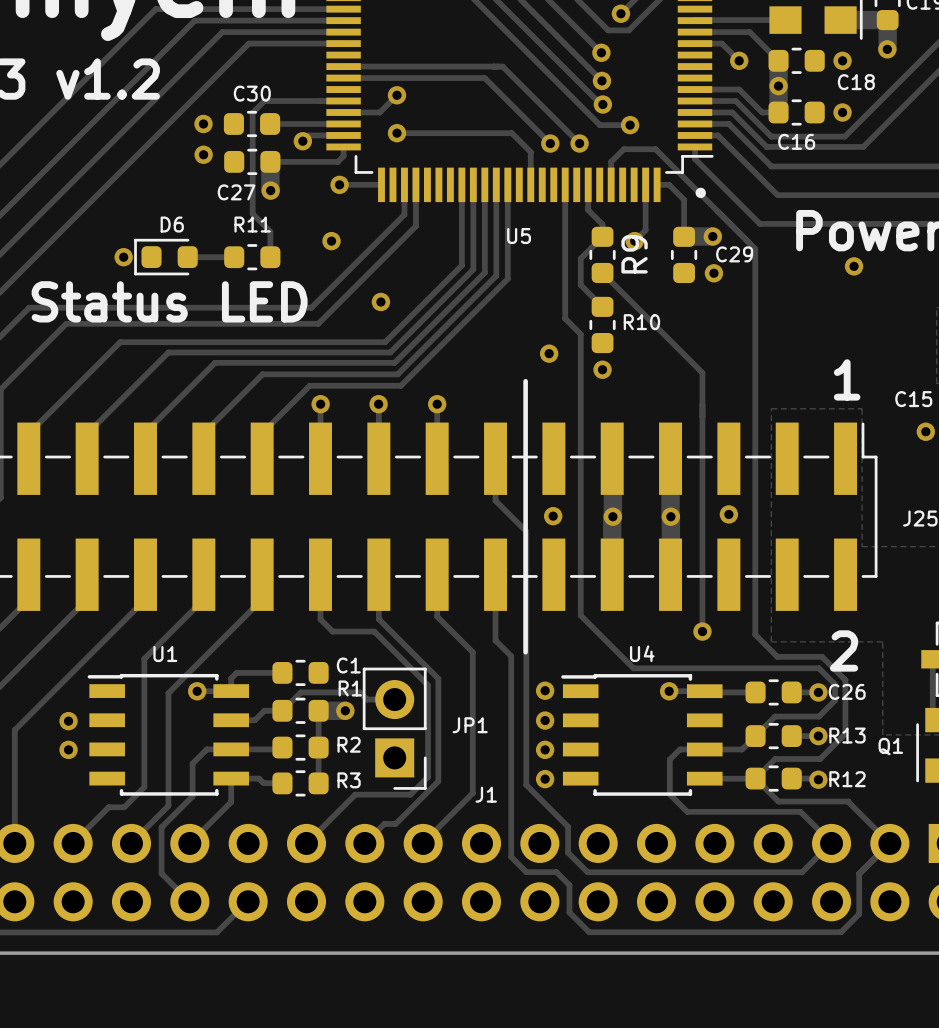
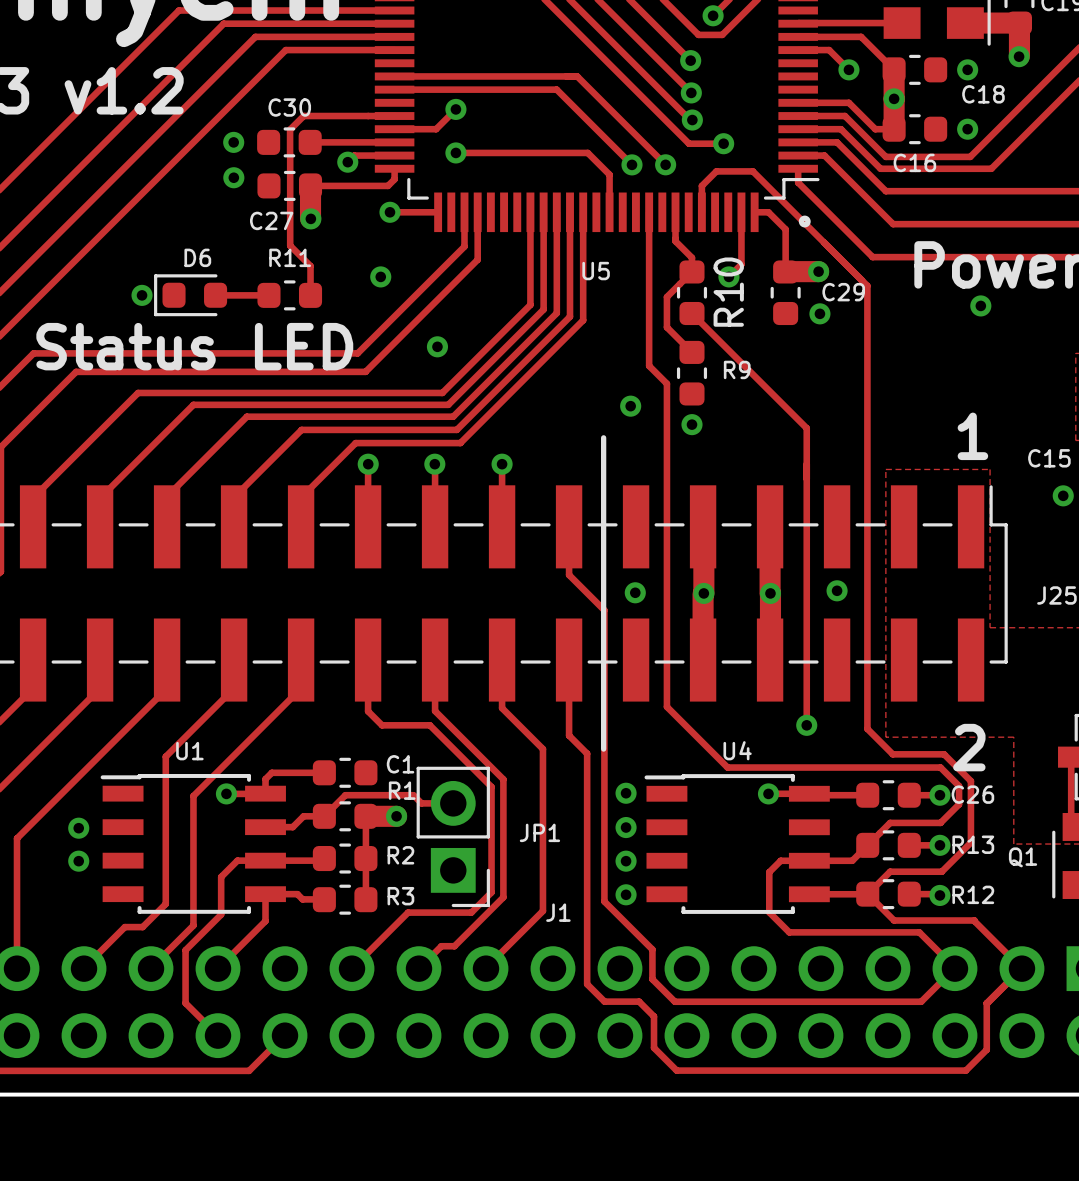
R9 name: R9 (634, 254) -> R10 (728, 292)
R10 name: R10 (641, 322) -> R9 (737, 369)

